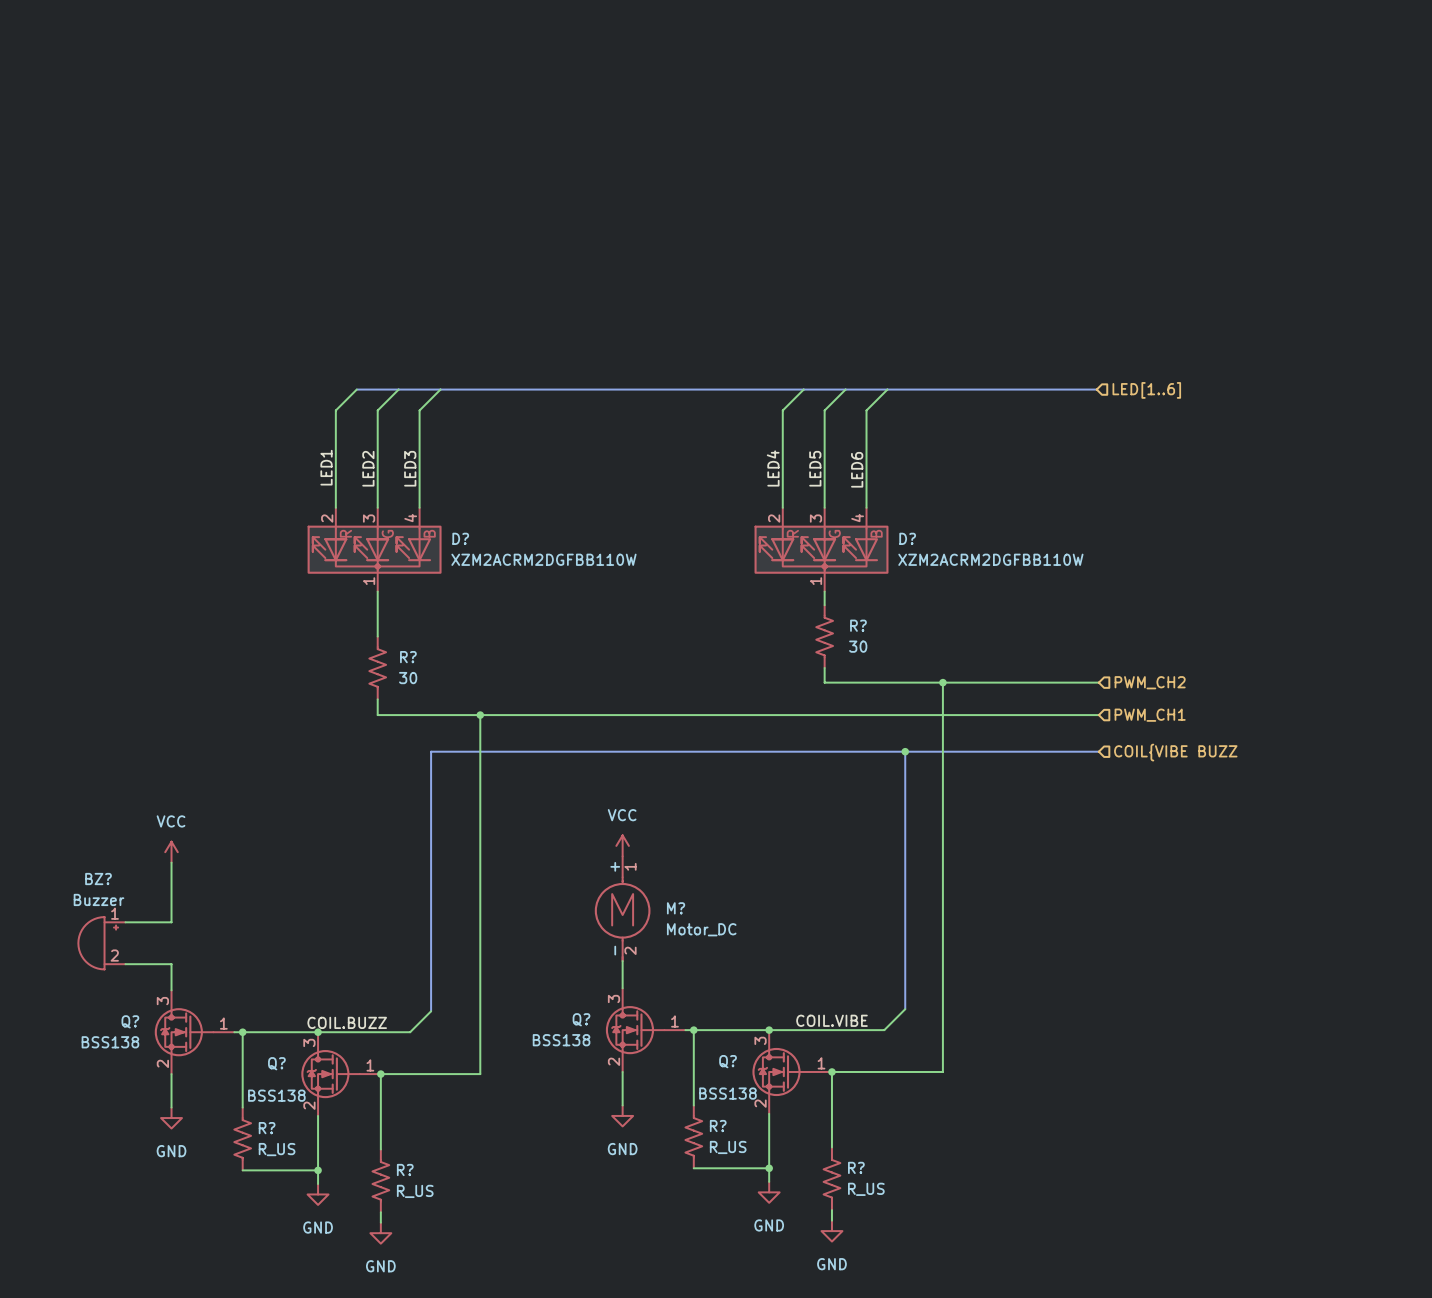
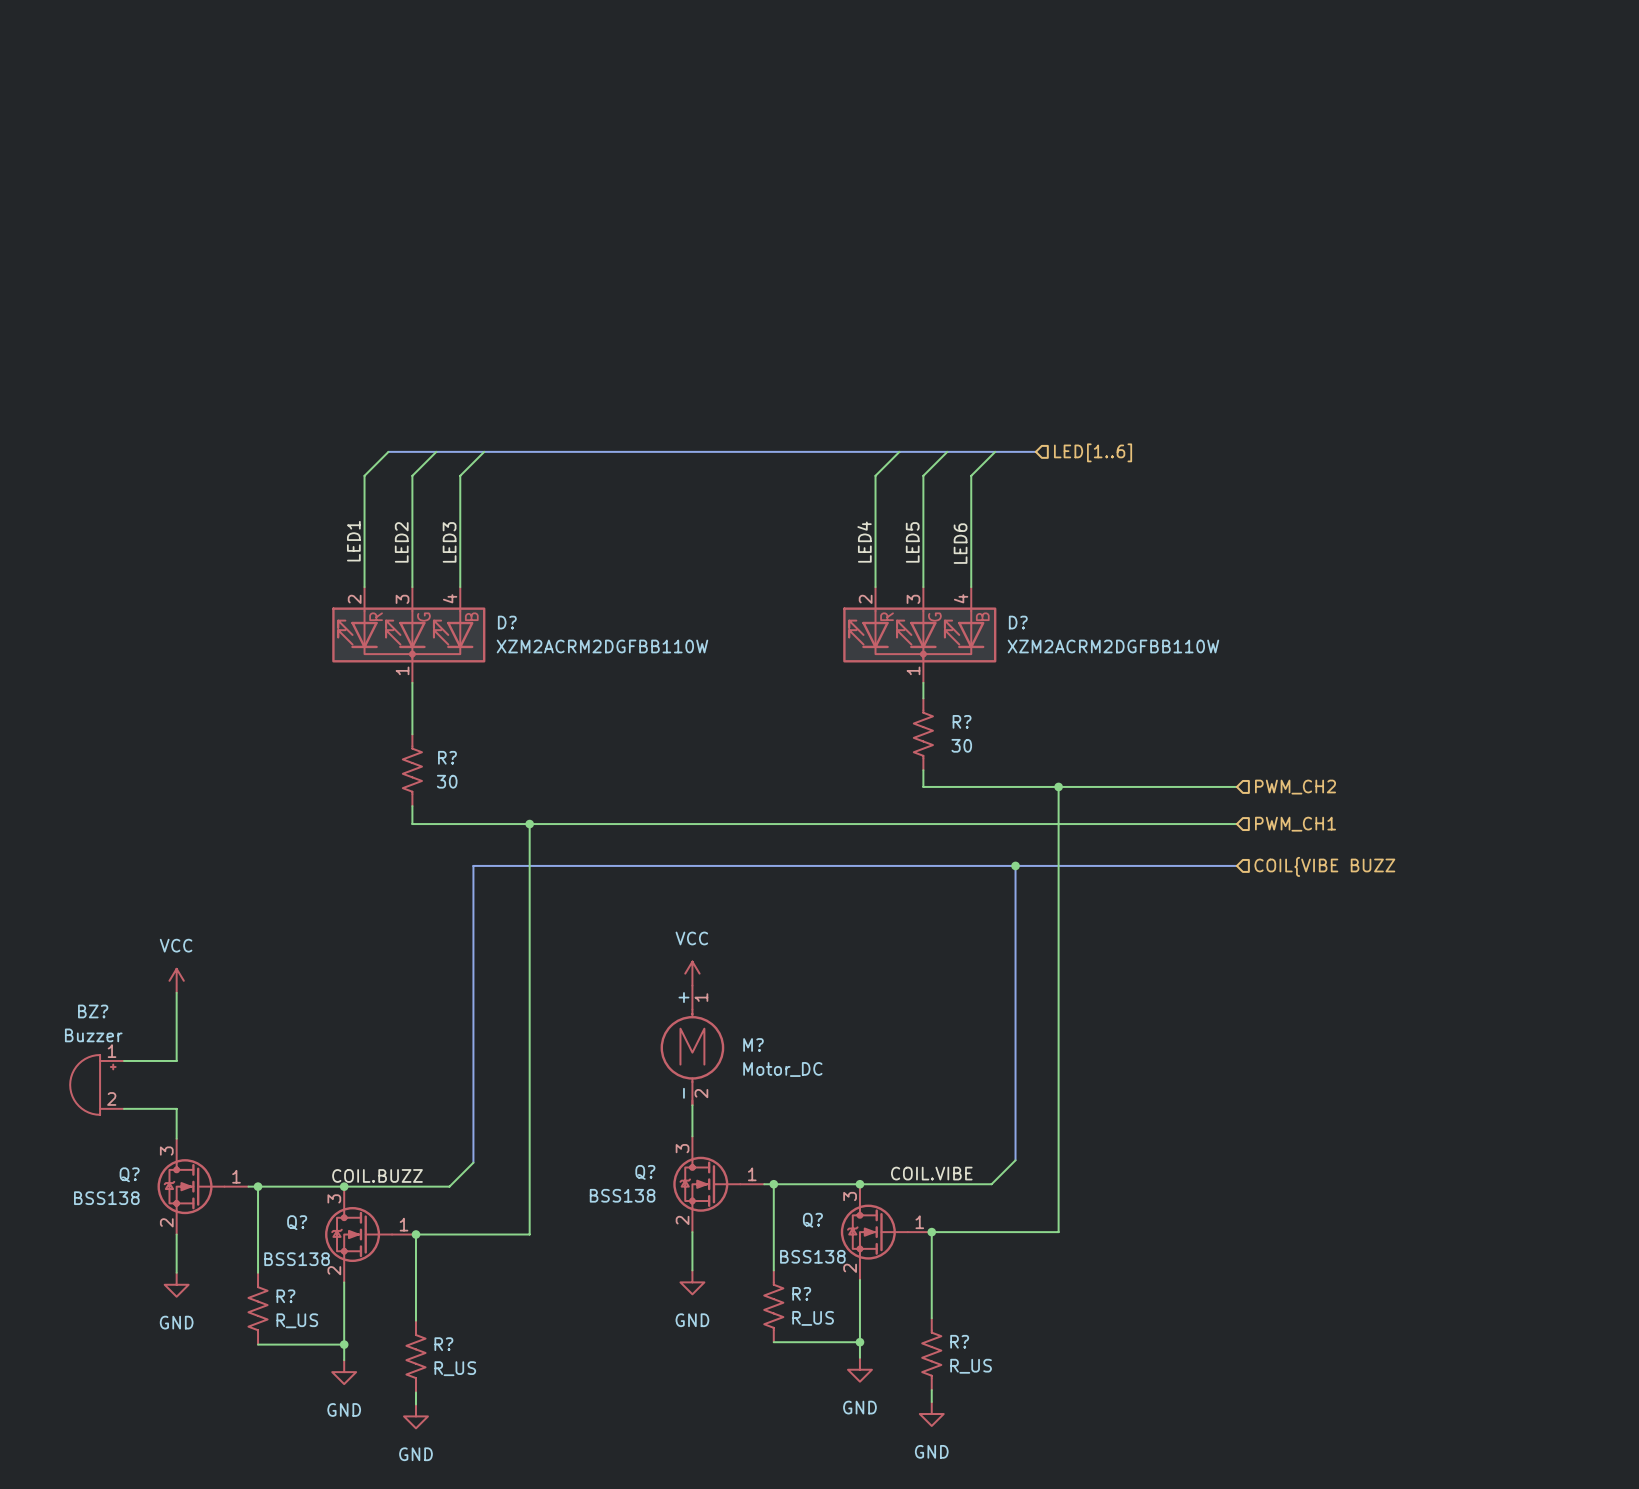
bus: (923, 389) (1096, 389) -> none
hierarchical label position: LED[1..6] (1146, 390) -> LED[1..6] (1093, 452)

